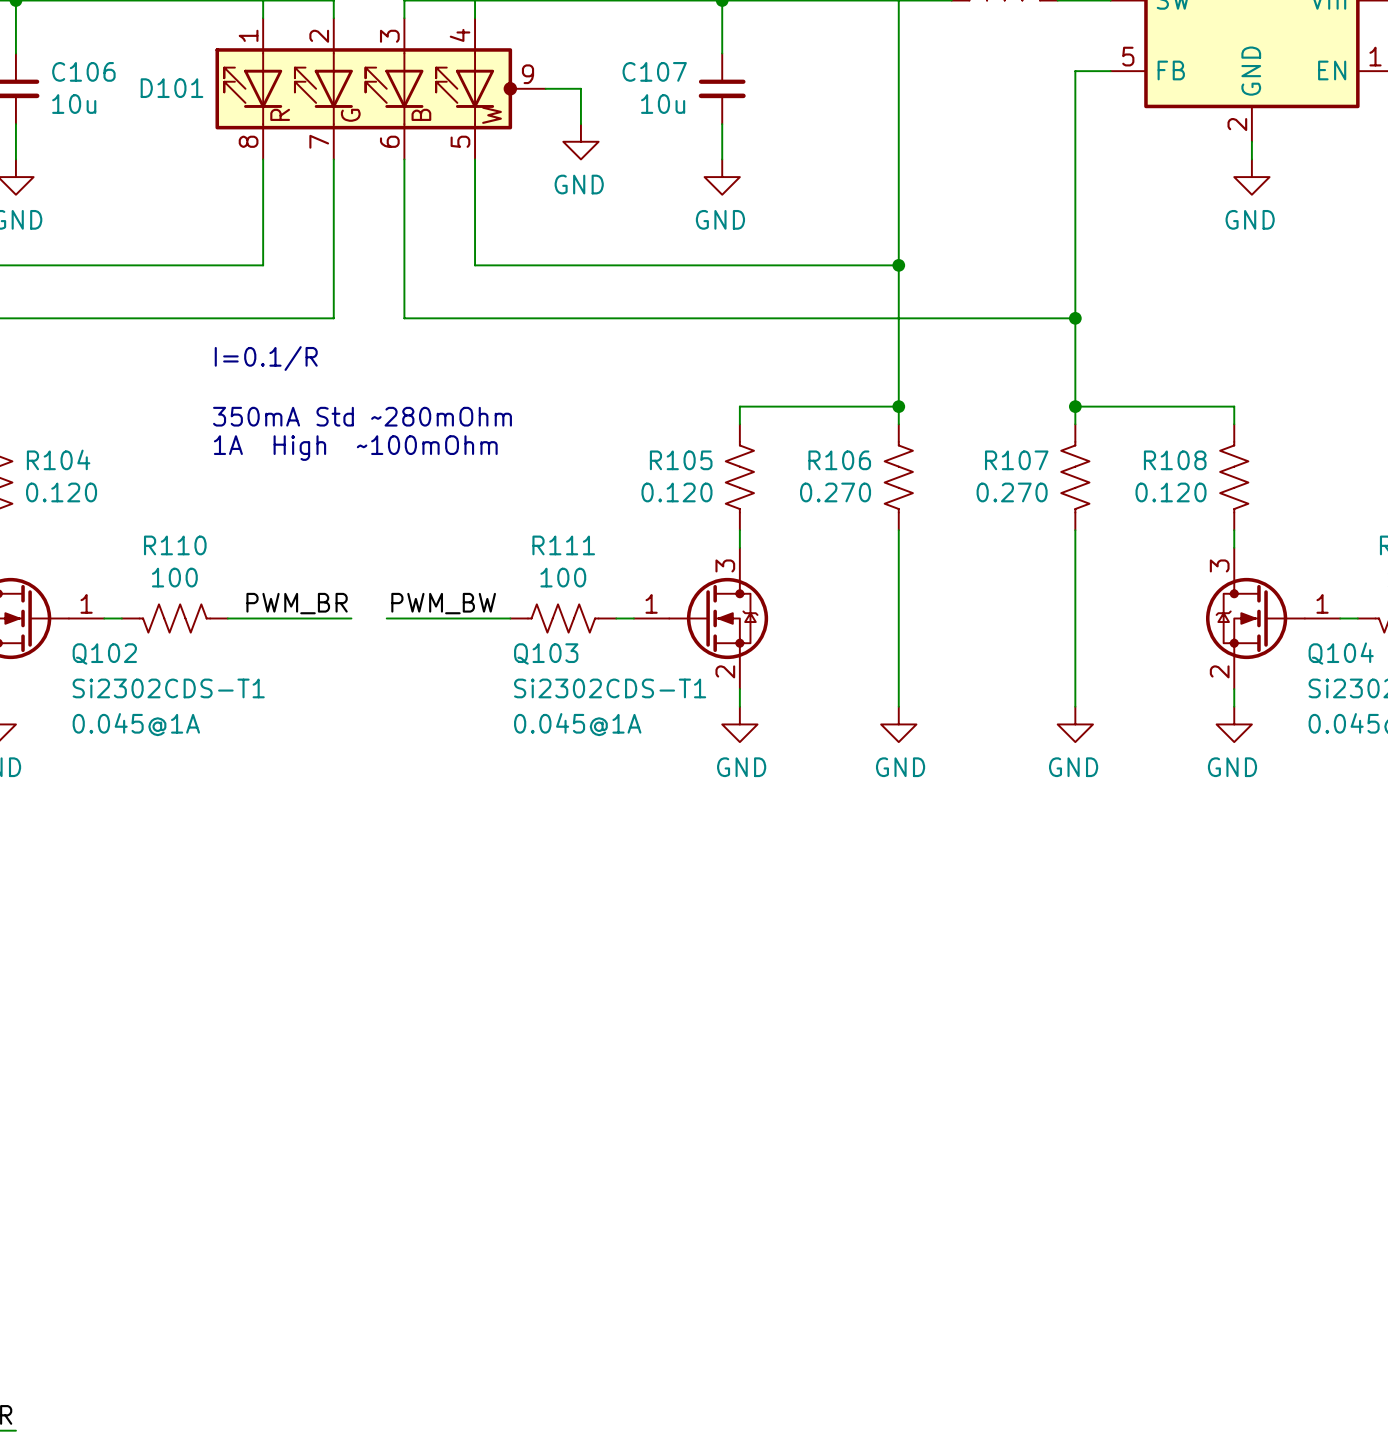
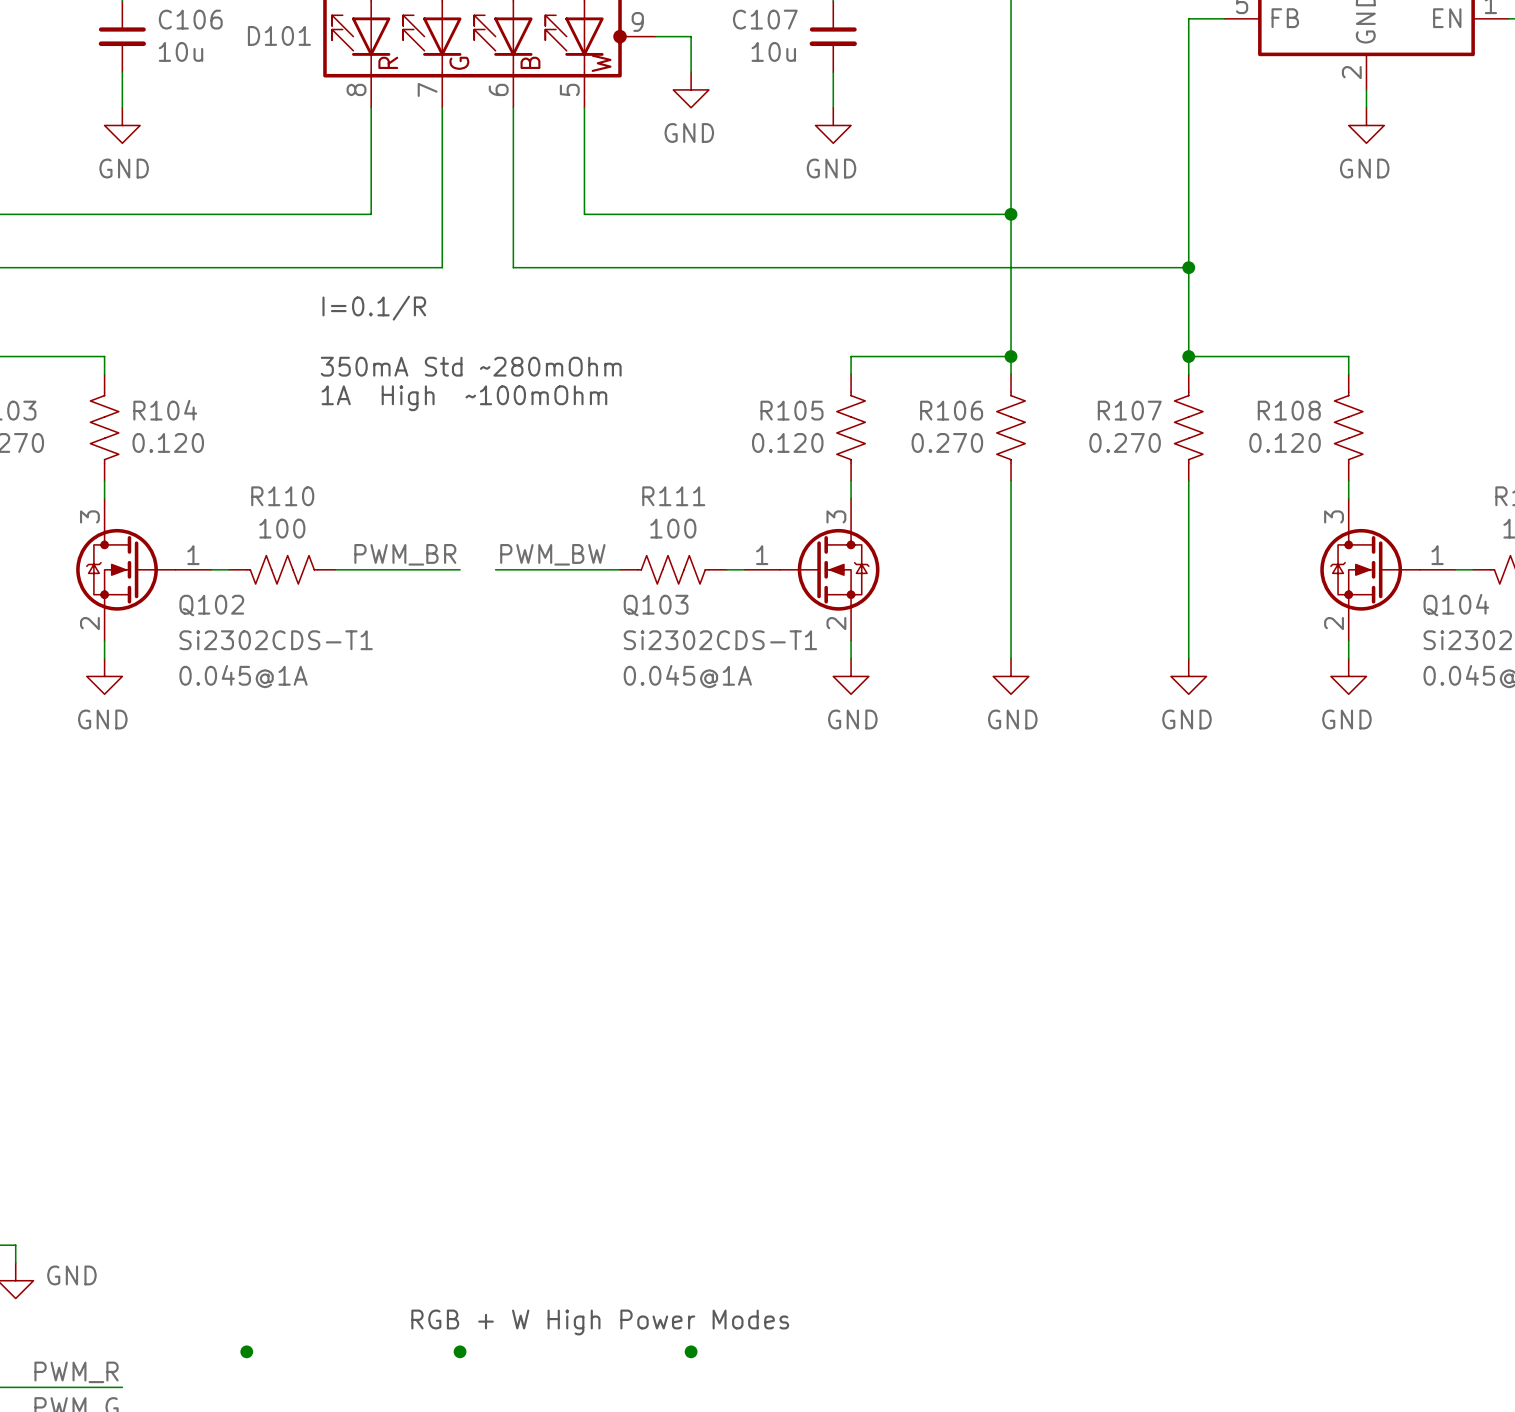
text: none -> RGB + W High Power Modes (600, 1322)
junction: none -> (246, 1351)
junction: none -> (460, 1351)
junction: none -> (691, 1351)

